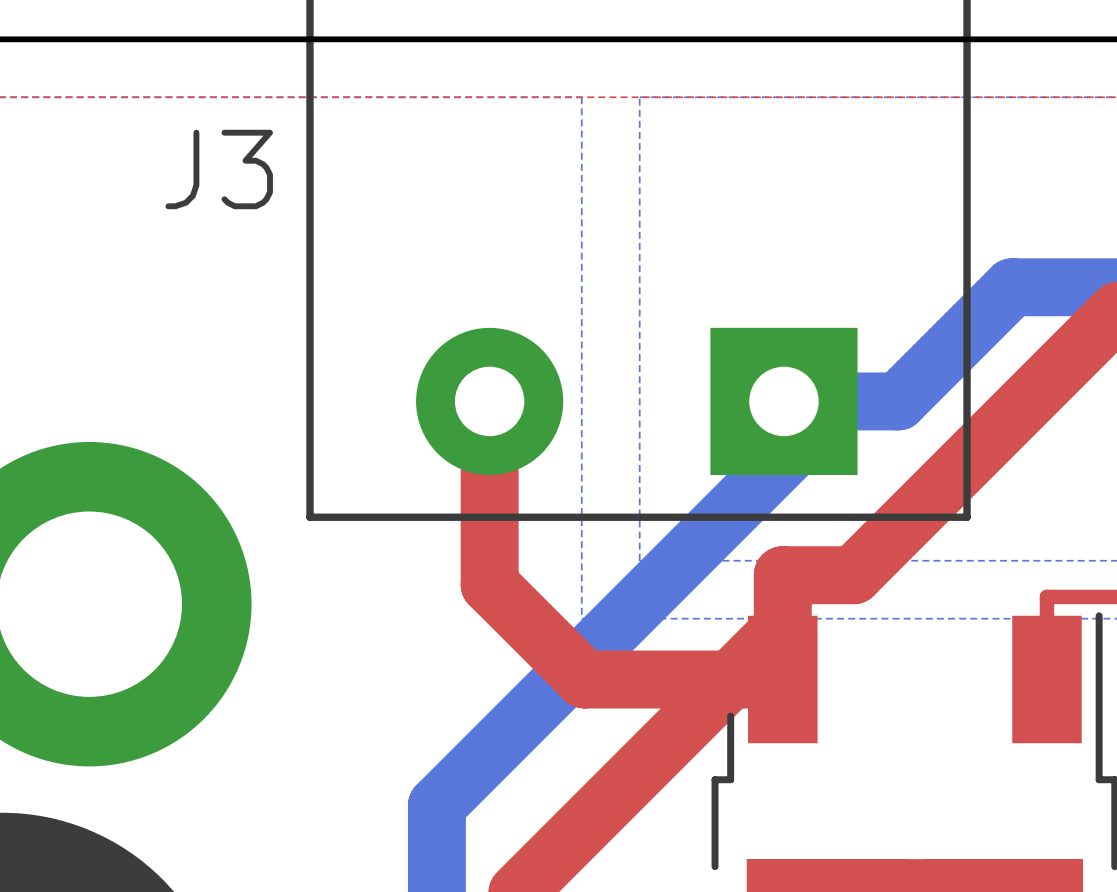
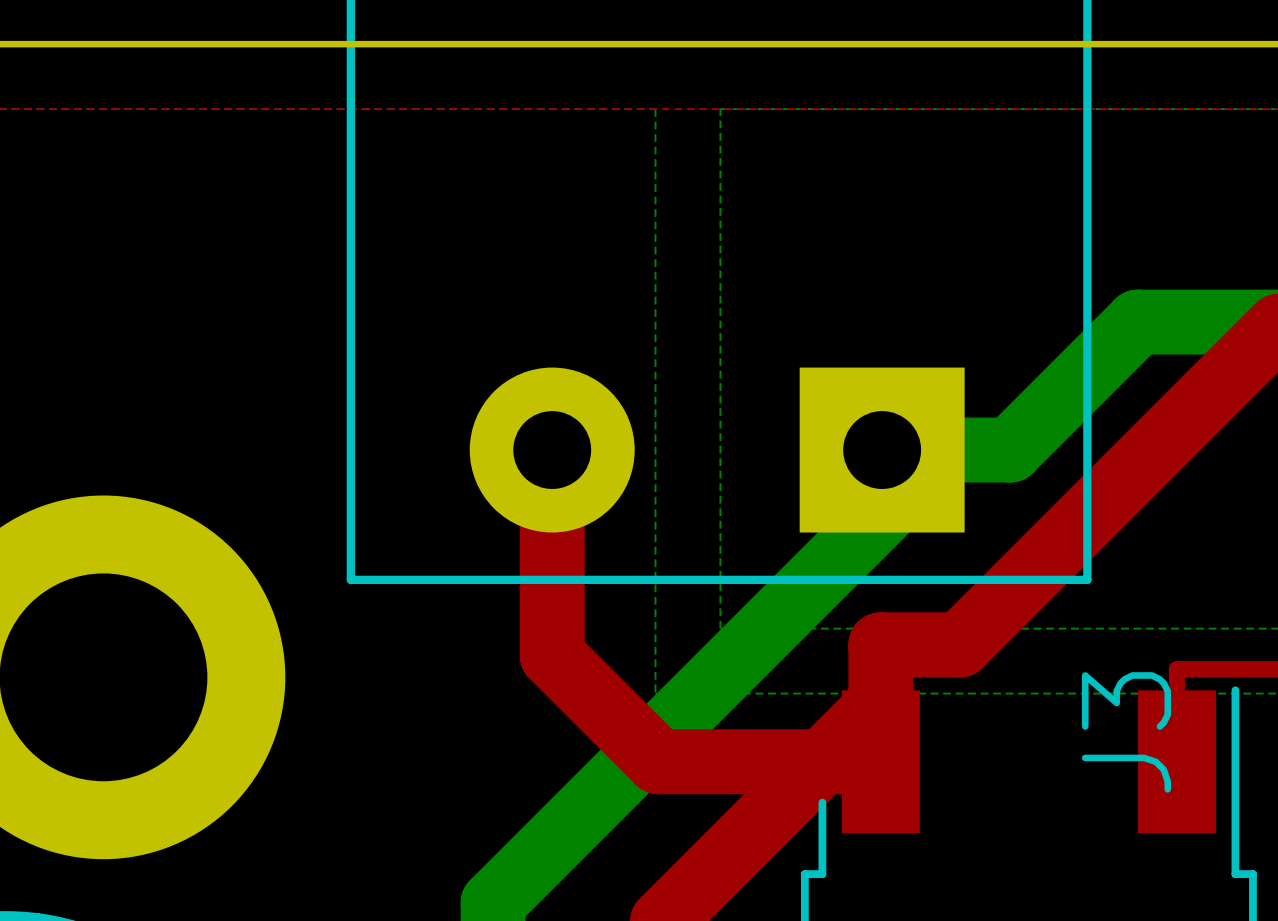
J3 name rotation: 0° (219, 169) -> 90° counterclockwise (1126, 732)
J3 name position: J3 (219, 169) -> J3 (1126, 732)

